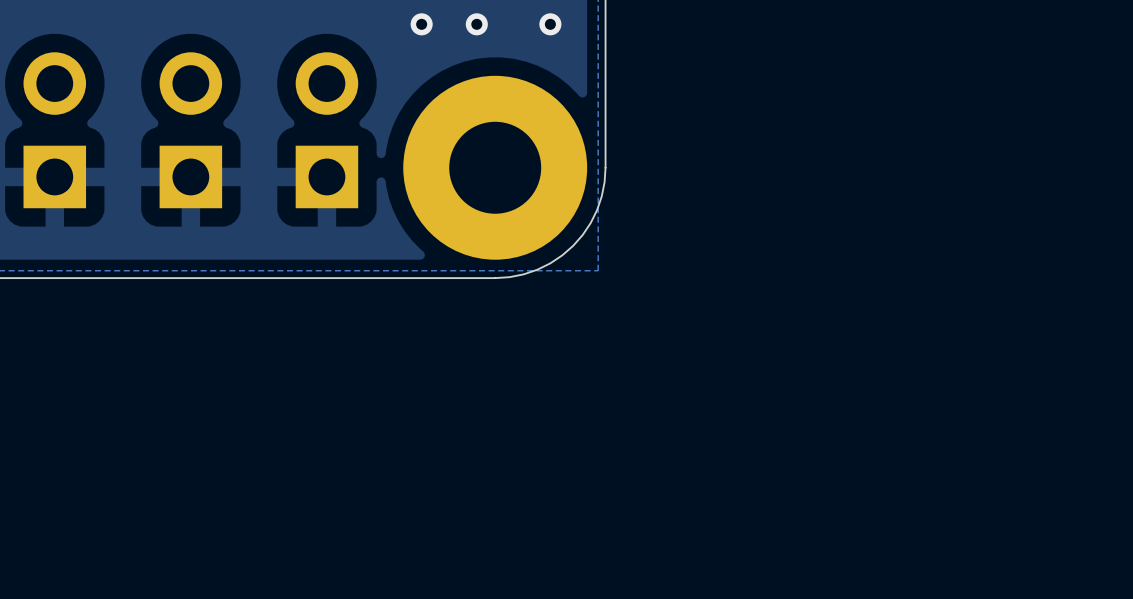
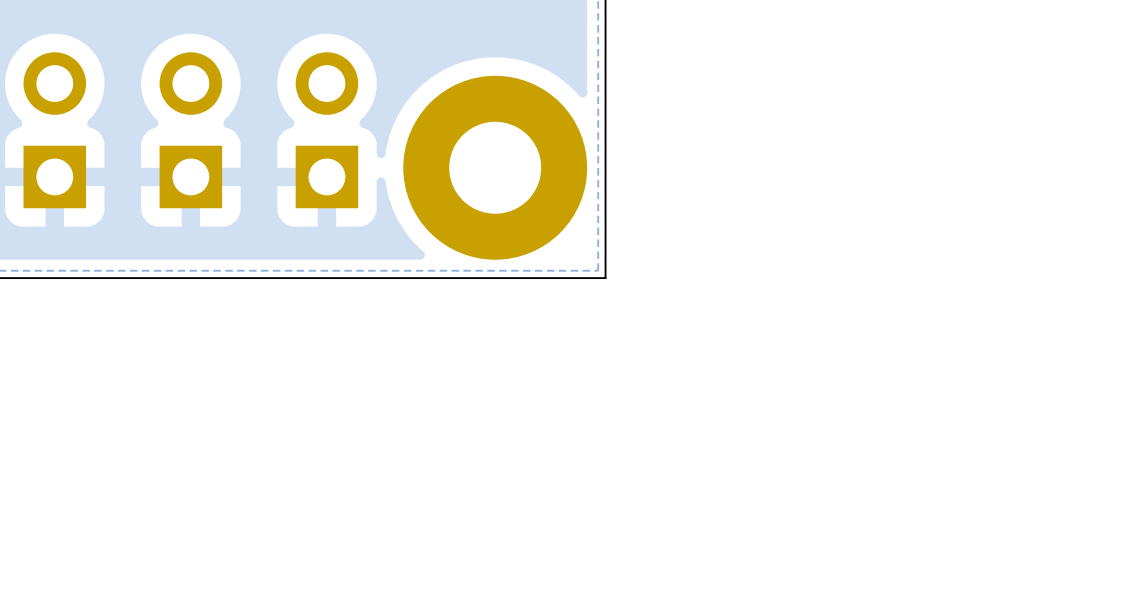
via: (421, 24) -> none
via: (476, 24) -> none
via: (550, 24) -> none
board edge: (605, 167) (601, 196) (597, 209) (590, 222) (573, 245) (562, 255) (537, 269) (509, 277) (495, 278) -> (605, 167) (605, 278) (495, 278)

